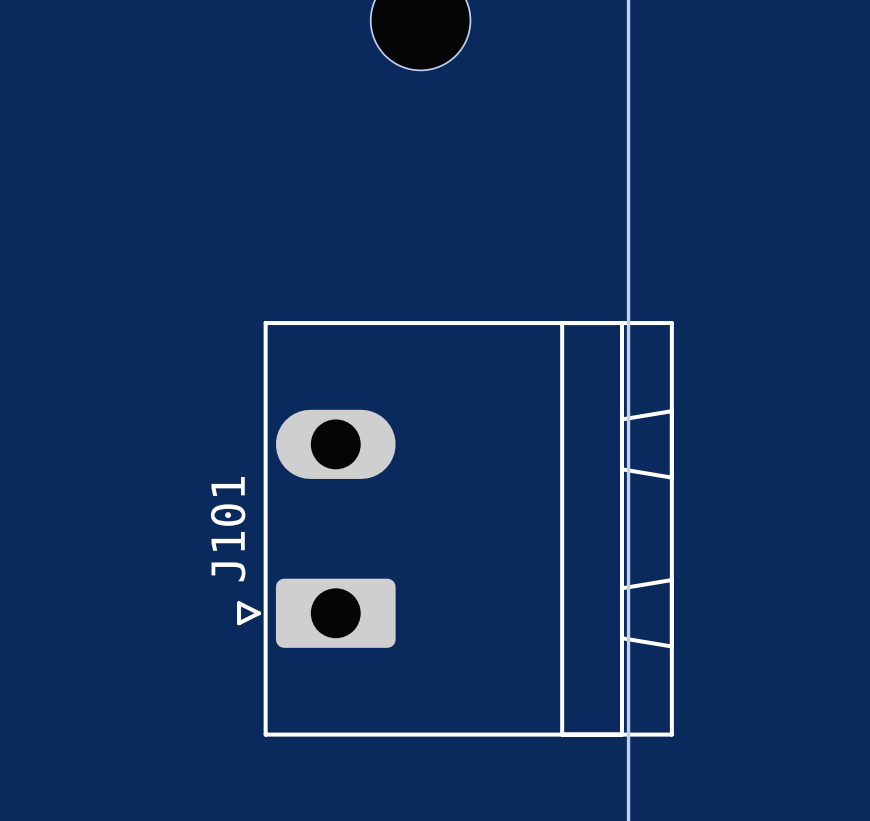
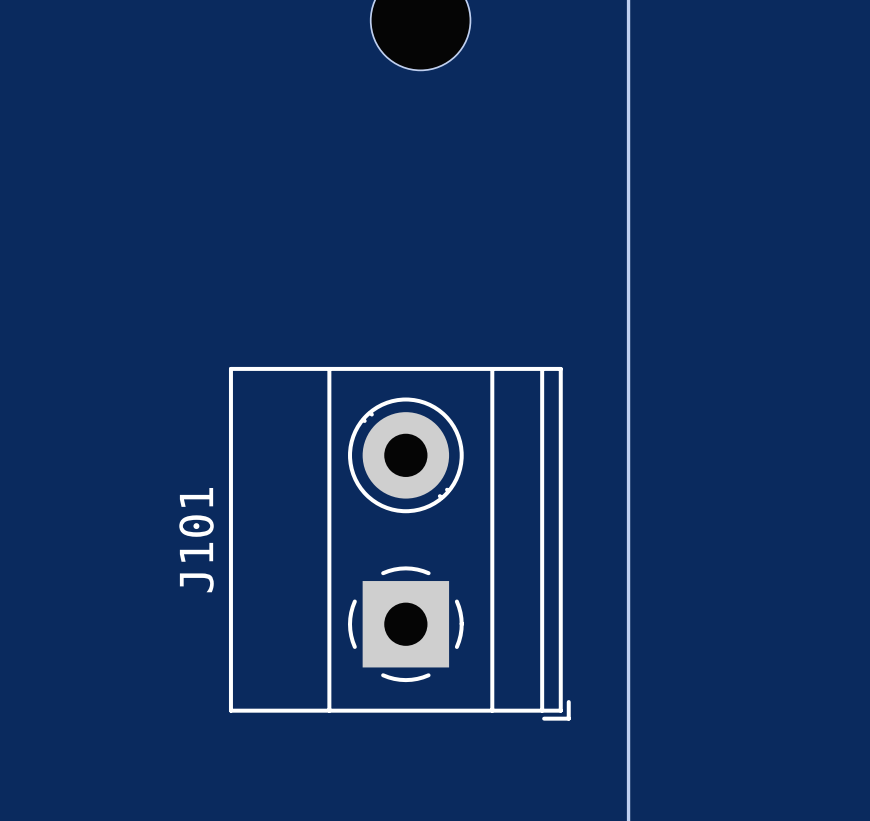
J101 footprint: [237, 321, 674, 737] -> [228, 366, 571, 721]

